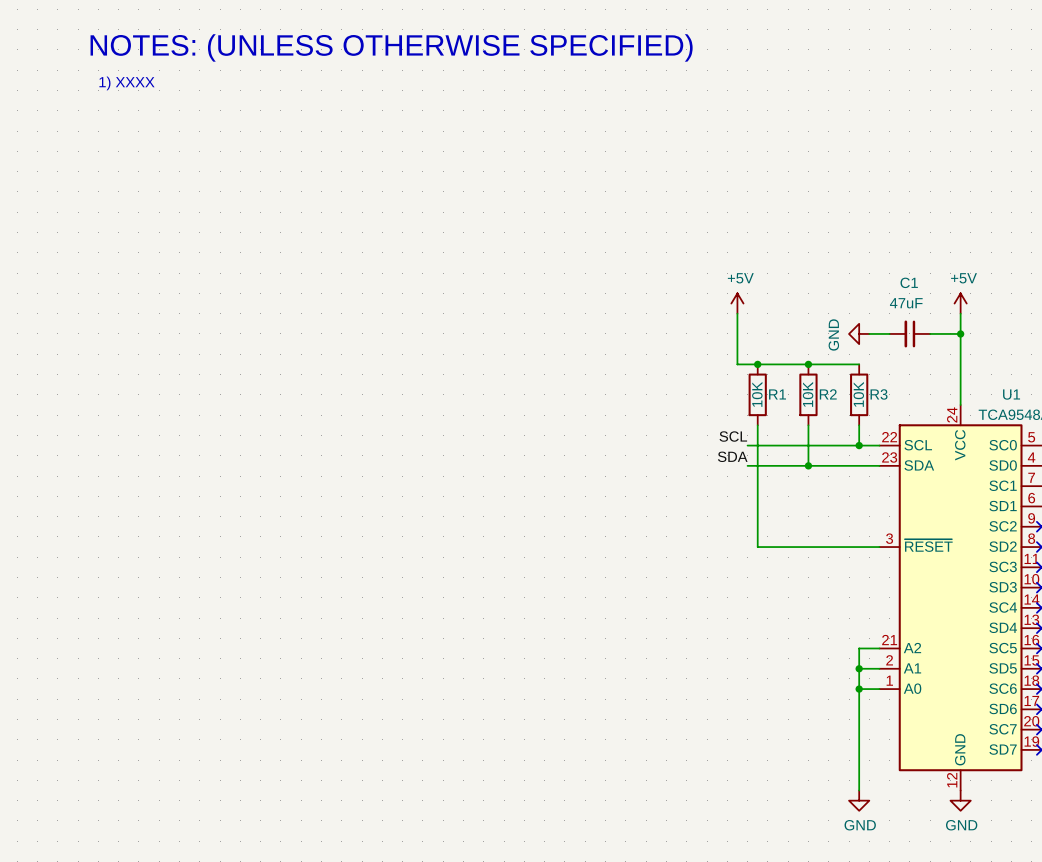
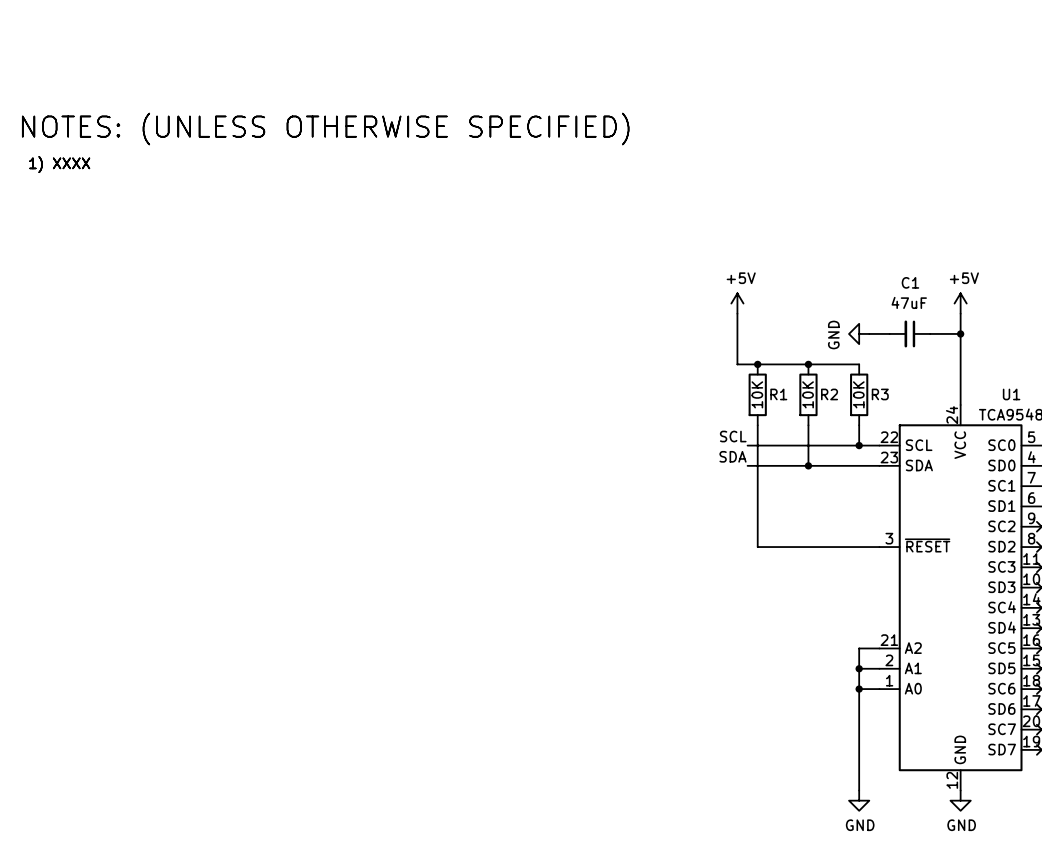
text position: NOTES: (UNLESS OTHERWISE SPECIFIED) (391, 47) -> NOTES: (UNLESS OTHERWISE SPECIFIED) (325, 129)
text position: 1) XXXX (126, 83) -> 1) XXXX (59, 164)

